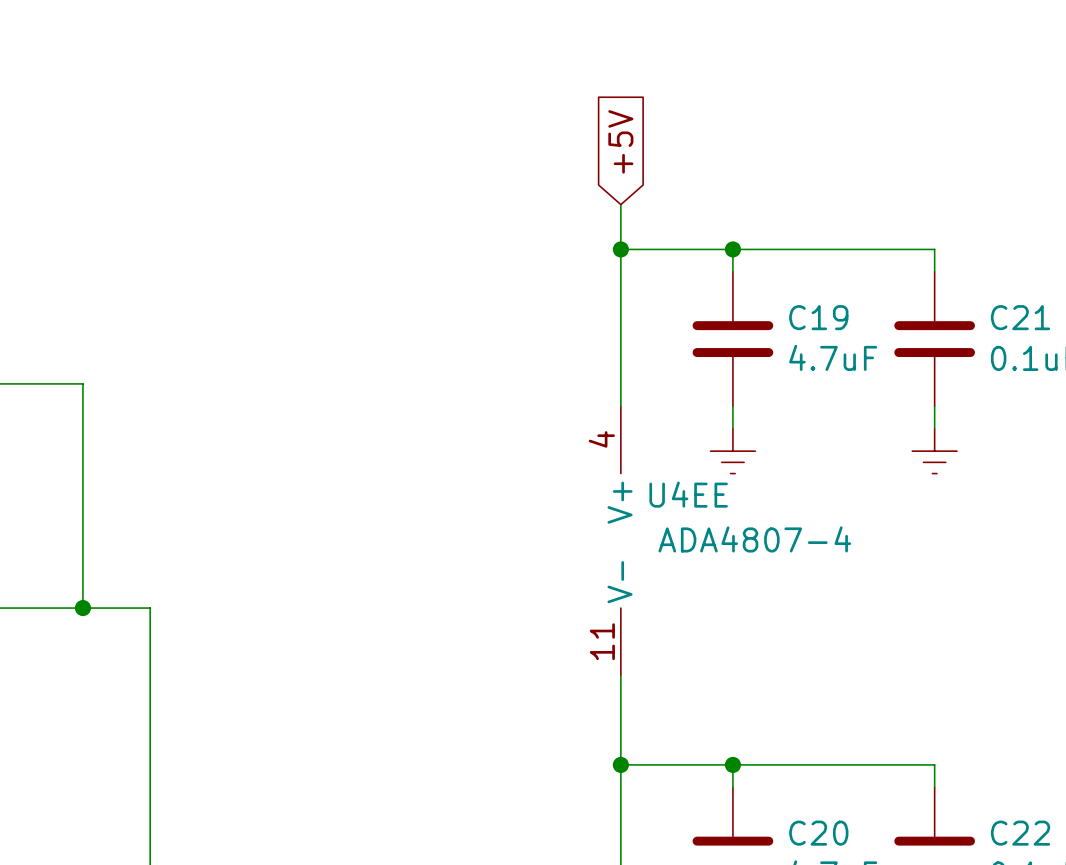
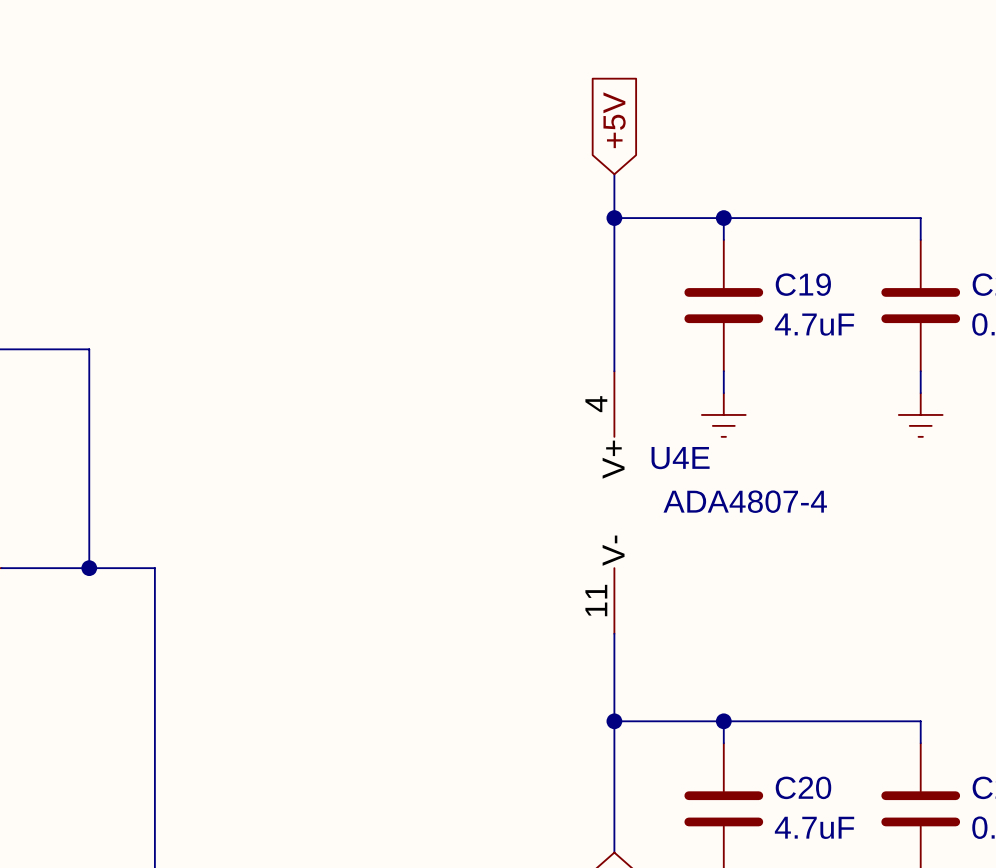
U4EE name: U4EE (688, 494) -> U4E (680, 458)

